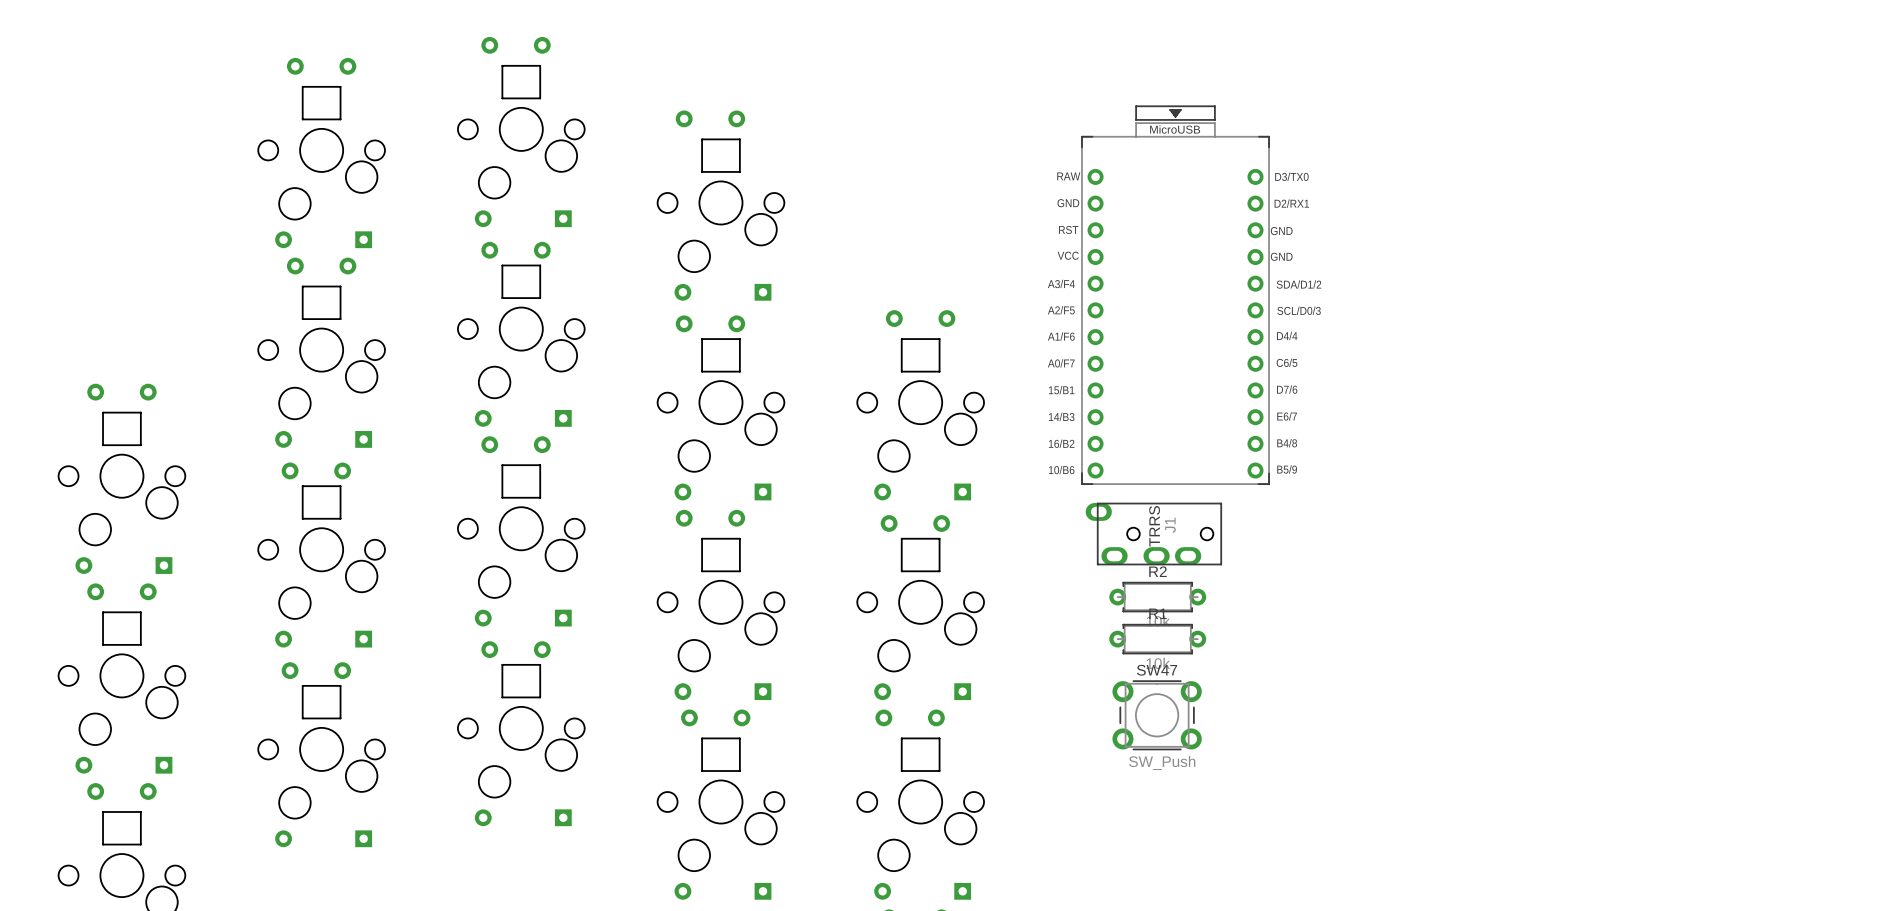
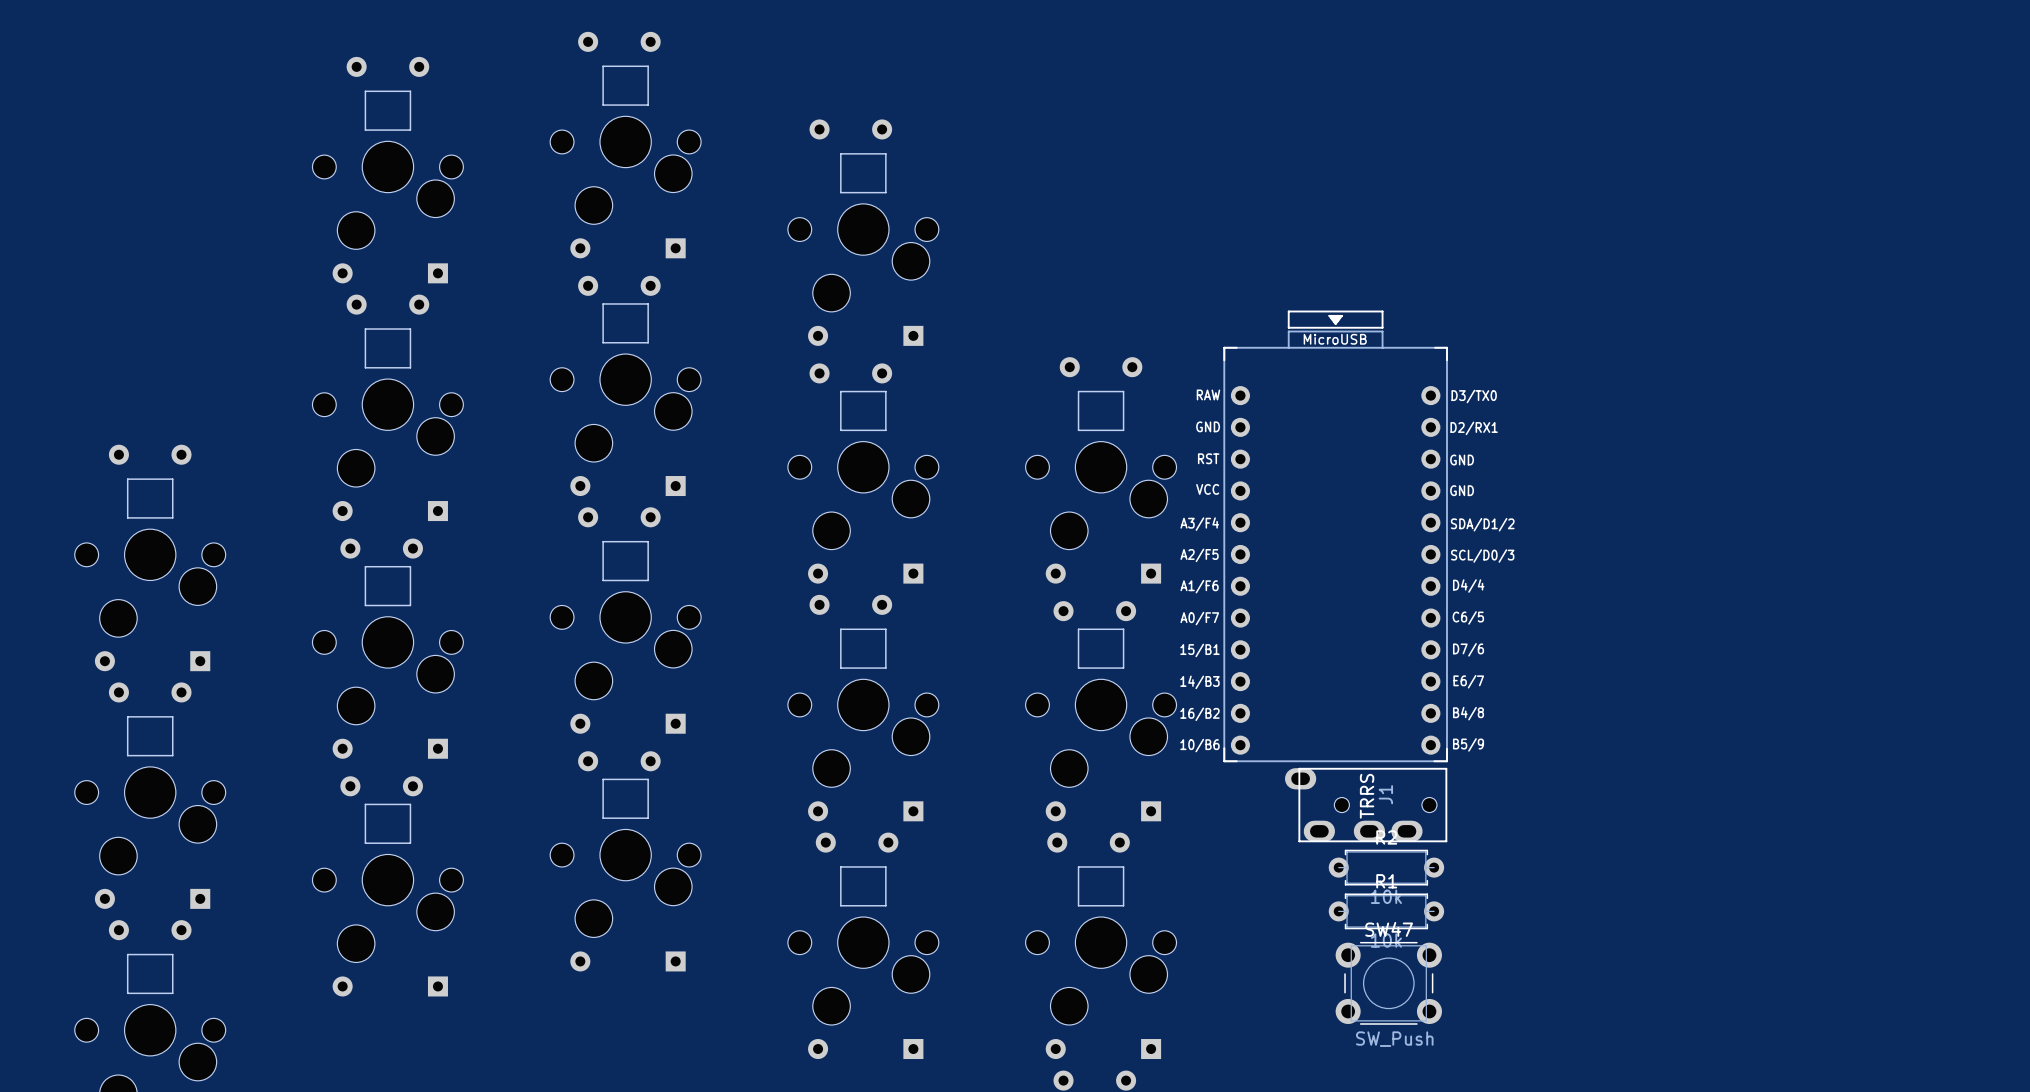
part position: (1175, 295) -> (1335, 536)
J1 position: (1153, 534) -> (1366, 805)
R2 position: (1157, 597) -> (1386, 867)
R1 position: (1157, 639) -> (1386, 911)
SW47 position: (1157, 715) -> (1388, 983)

